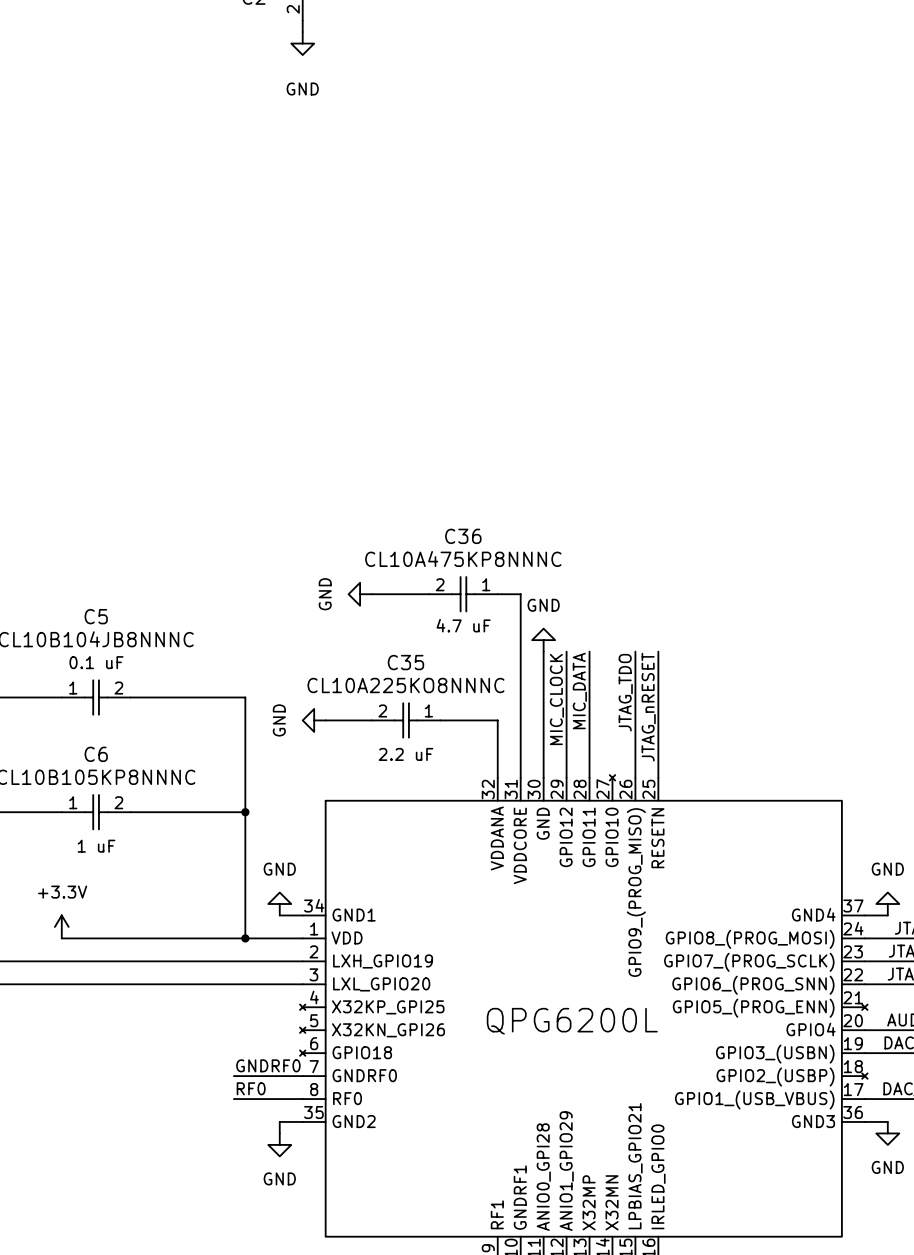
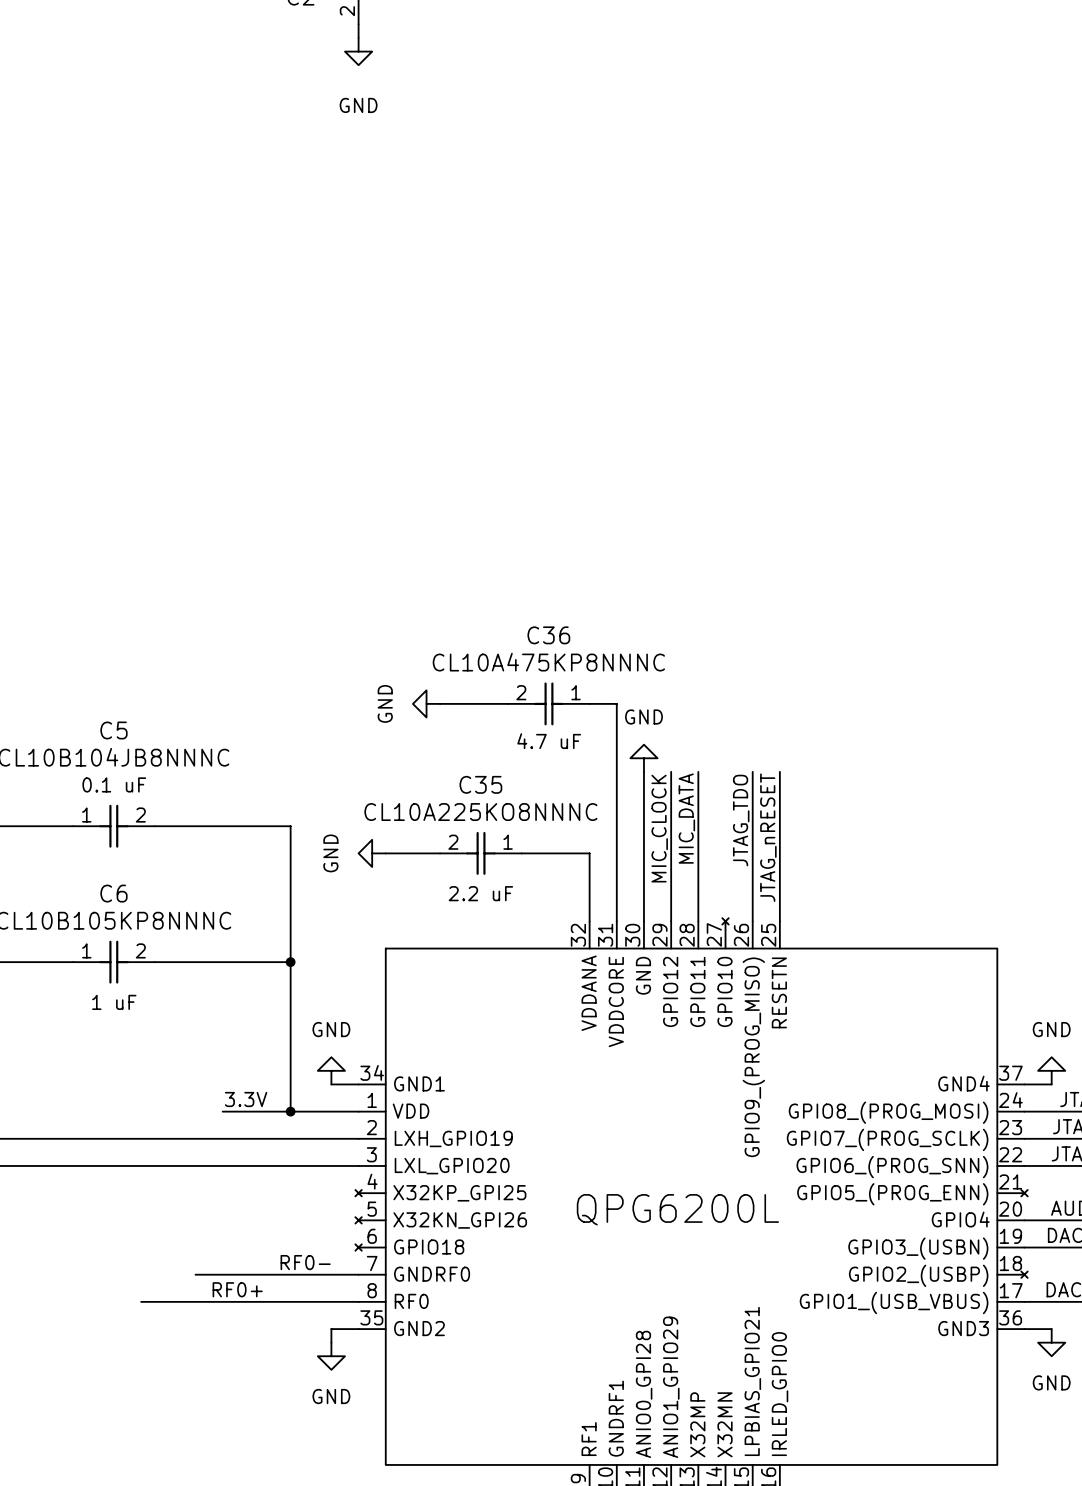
power symbol: +3.3V (61, 926) -> none
label: none -> 3.3V (246, 1099)
wire: (61, 938) (187, 938) -> none
label: GNDRF0 (268, 1065) -> RF0- (305, 1262)
wire: none -> (195, 1274) (277, 1274)
label: none -> RF0+ (237, 1289)
label: RF0 (251, 1088) -> none
wire: none -> (141, 1301) (277, 1301)

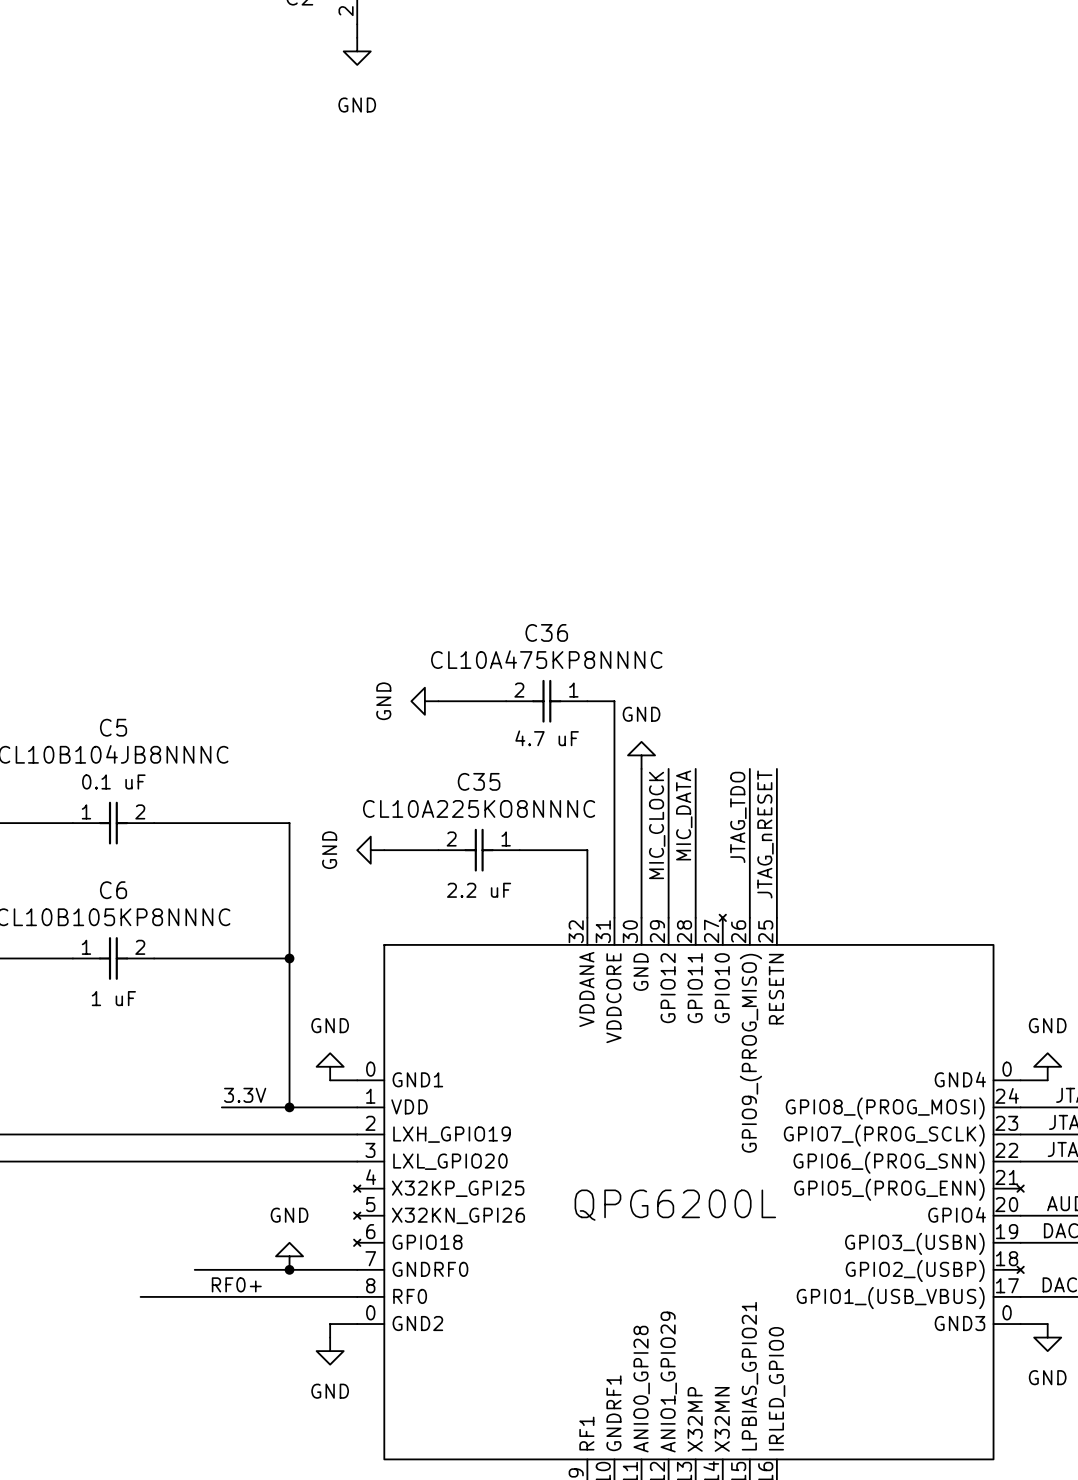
part pin number: 34 (372, 1072) -> 0 (370, 1069)
part pin number: 37 (1010, 1073) -> 0 (1007, 1069)
power symbol: none -> GND (289, 1256)
label: RF0- (305, 1262) -> none
junction: none -> (289, 1269)
part pin number: 35 (371, 1317) -> 0 (370, 1312)
part pin number: 36 (1010, 1317) -> 0 (1007, 1312)

